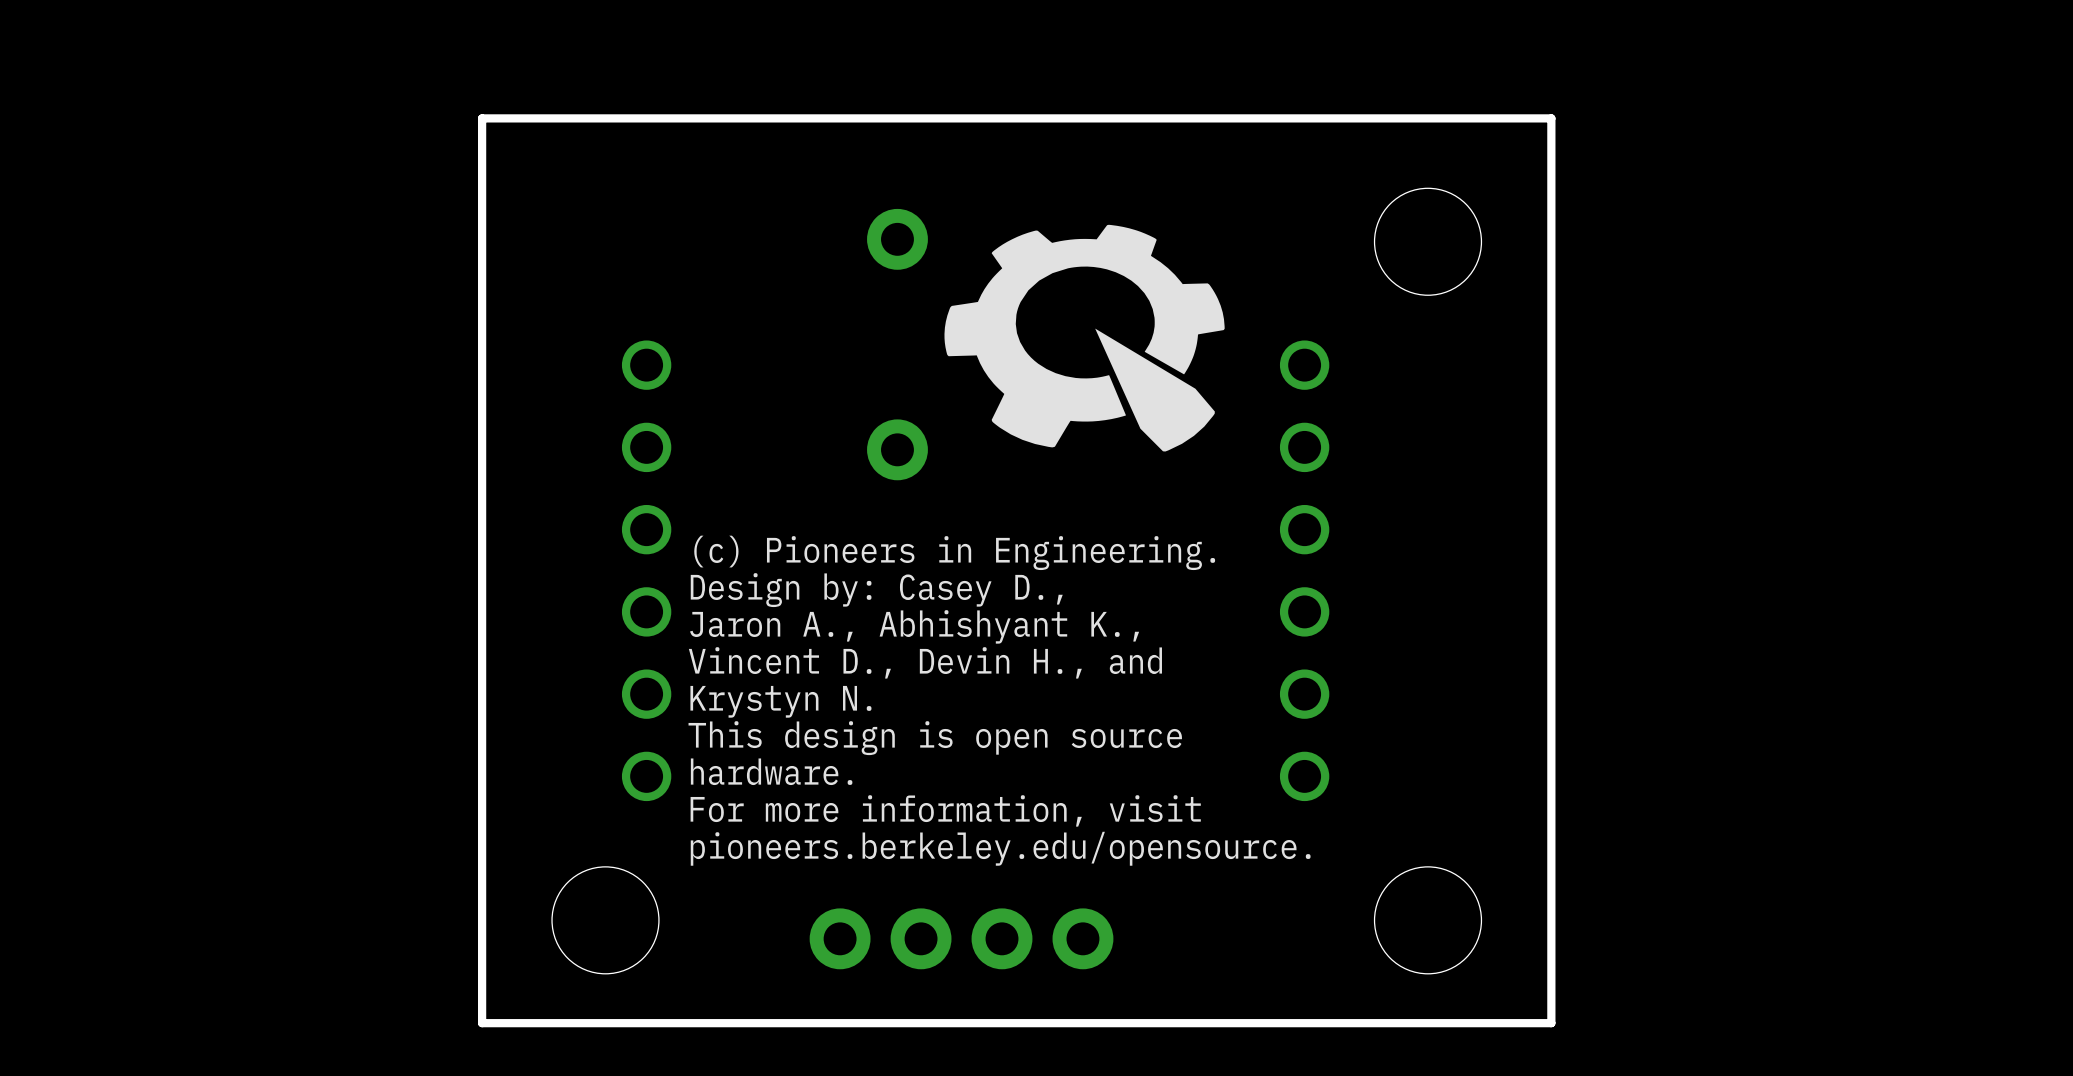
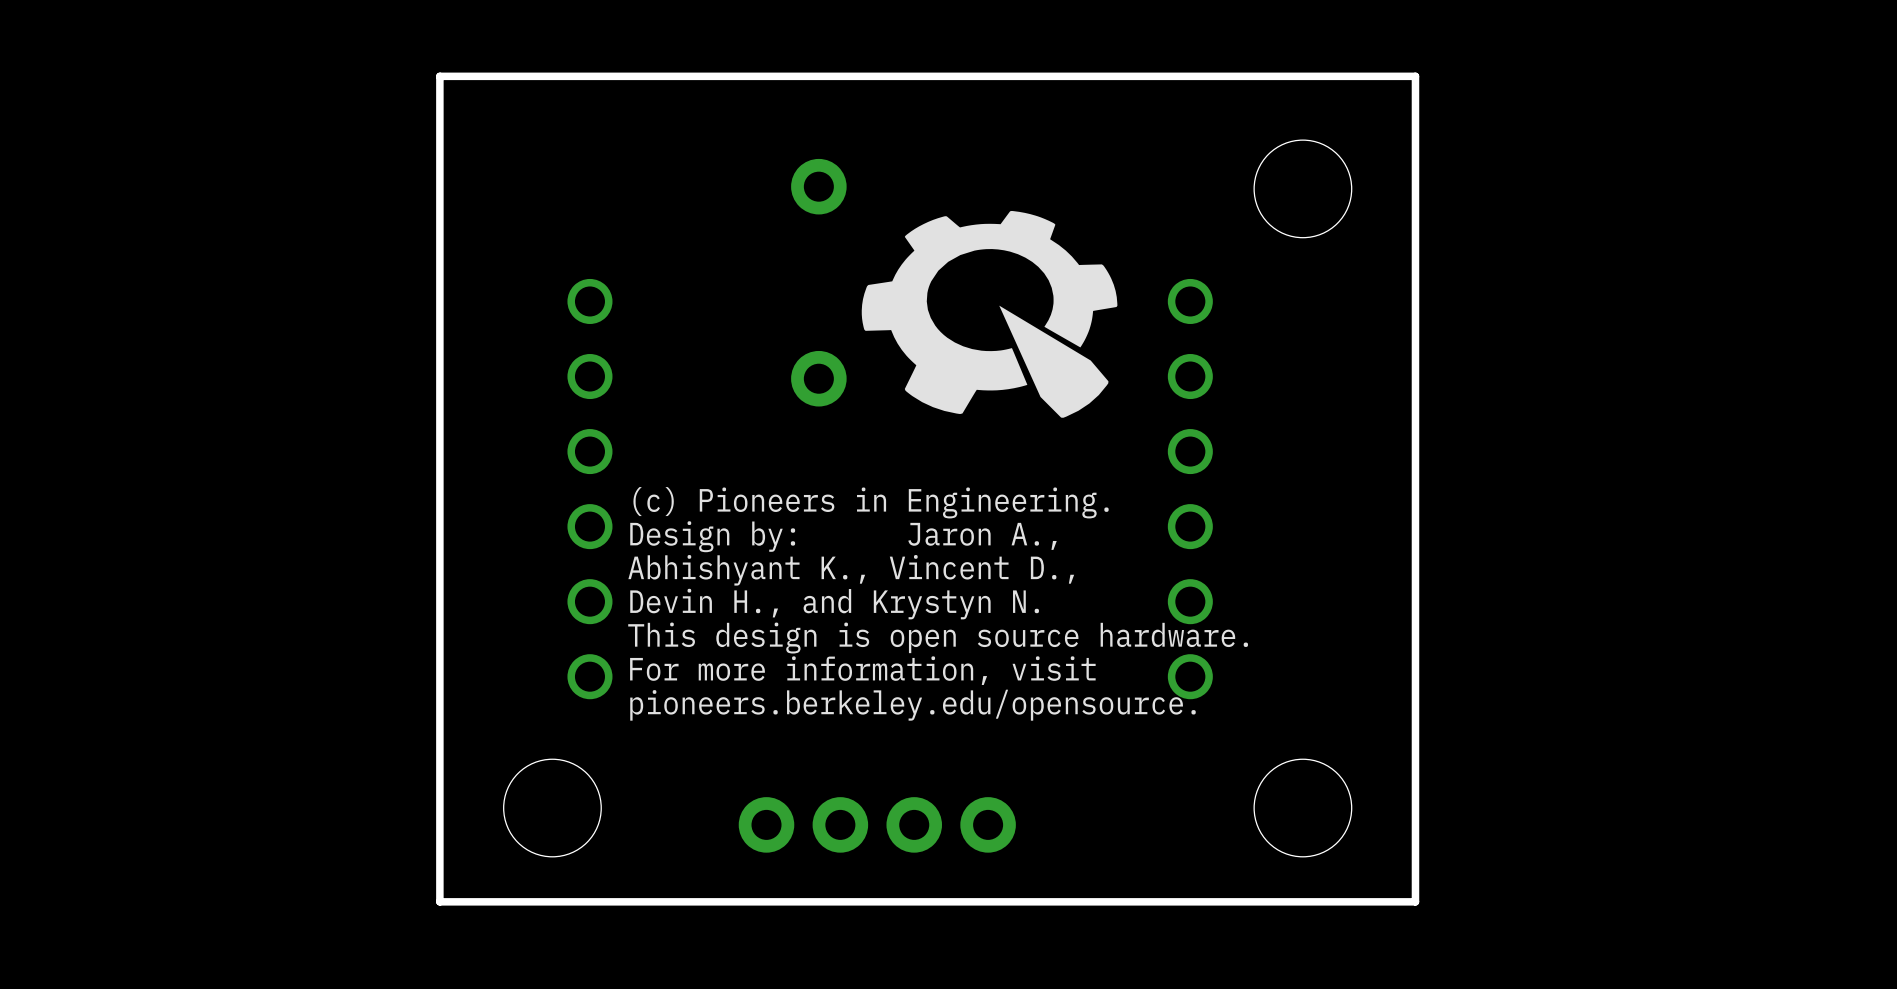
drawing position: (1084, 338) -> (989, 314)
text: (c) Pioneers in Engineering. (954, 552) -> none
text: Design by: Casey D., (876, 590) -> (c) Pioneers in Engineering. (871, 502)
text: Jaron A., Abhishyant K., (914, 626) -> Design by: Jaron A., (843, 536)
text: Vincent D., Devin H., and (925, 662) -> Abhishyant K., Vincent D., (851, 570)
text: Krystyn N. (780, 701) -> Devin H., and Krystyn N. (834, 604)
text: This design is open source (935, 738) -> This design is open source hardware. (938, 638)
text: hardware. (771, 771) -> For more information, visit (862, 670)
text: For more information, visit (945, 810) -> pioneers.berkeley.edu/opensource. (912, 705)
text: pioneers.berkeley.edu/opensource. (1000, 848) -> none

